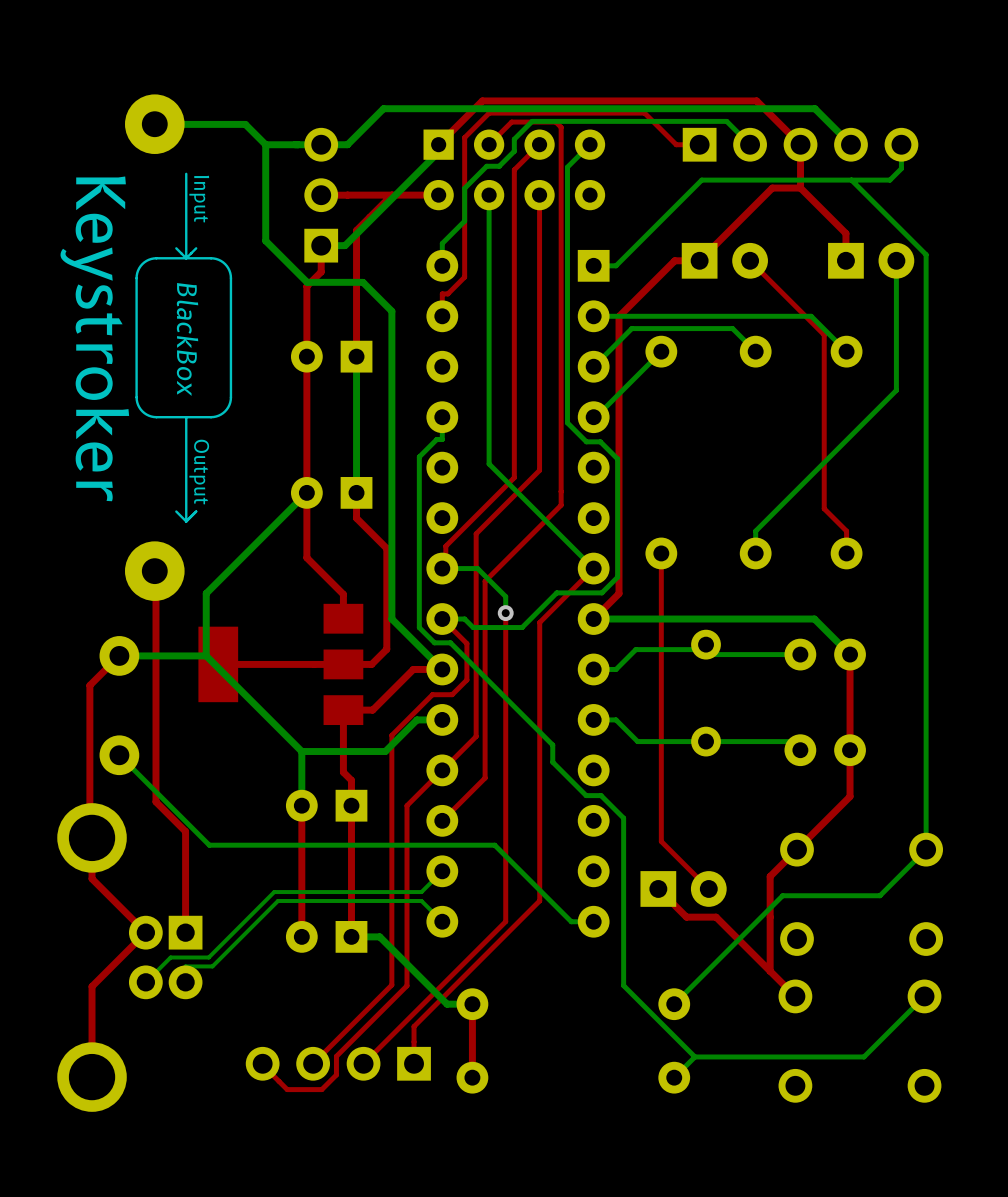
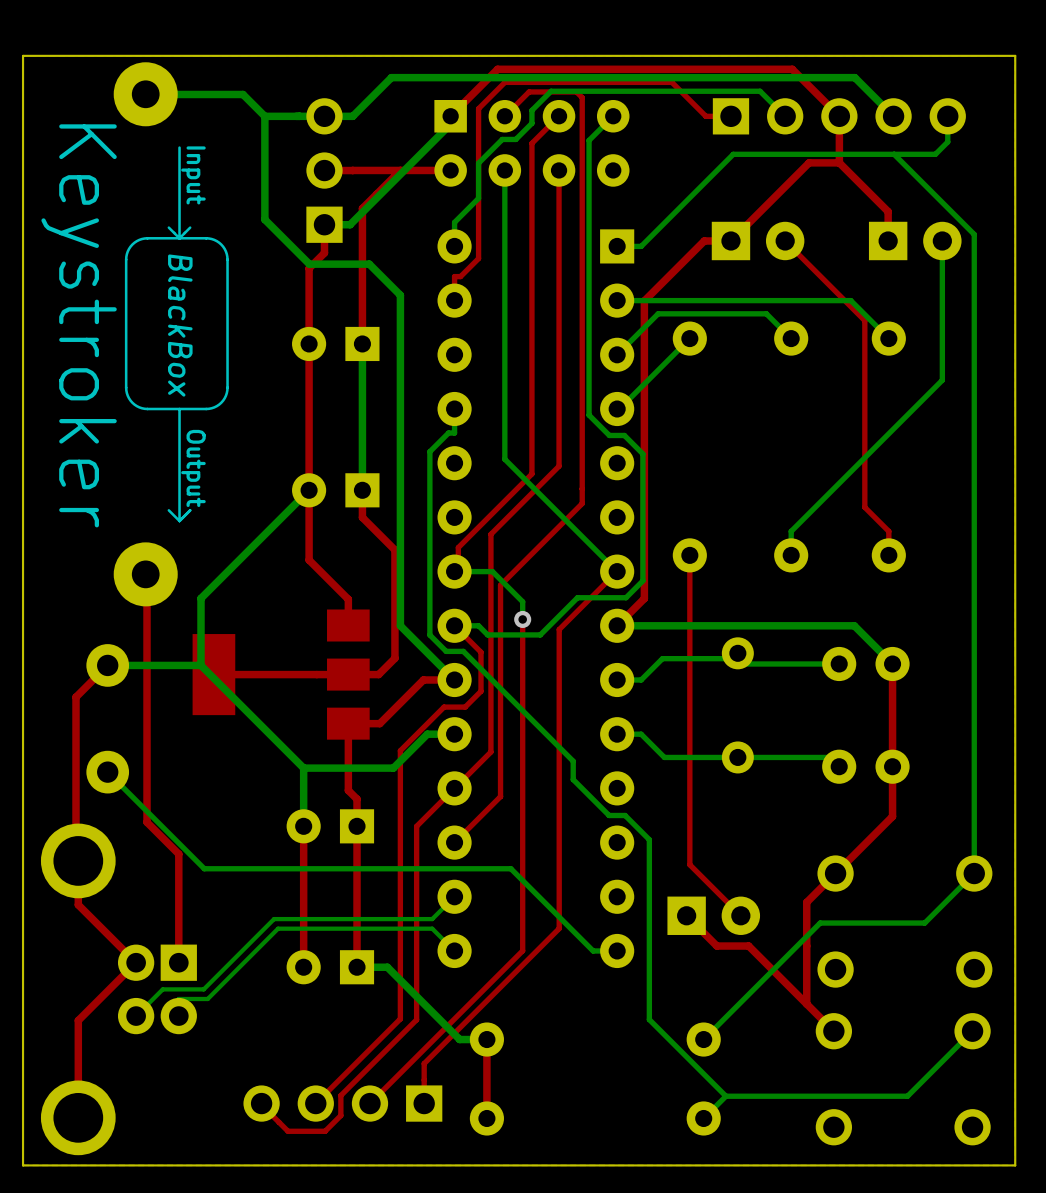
board edge: none -> (1015, 55) (23, 55) (23, 1165) (1015, 1165) (1015, 55)

